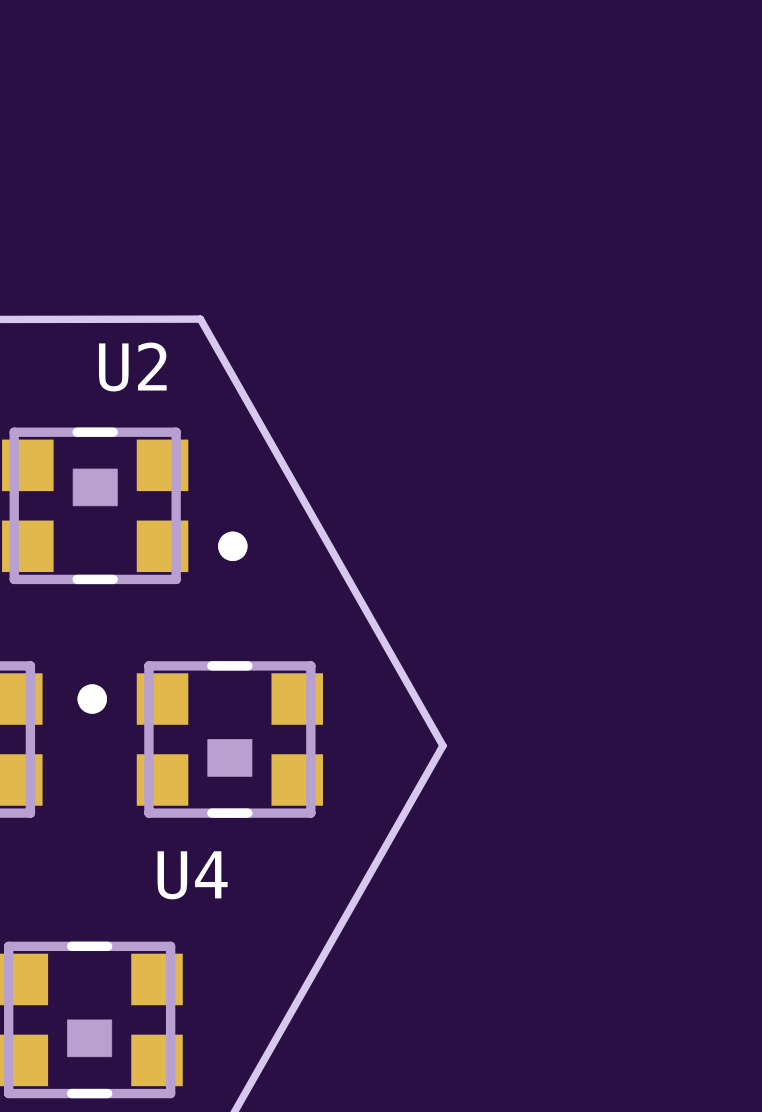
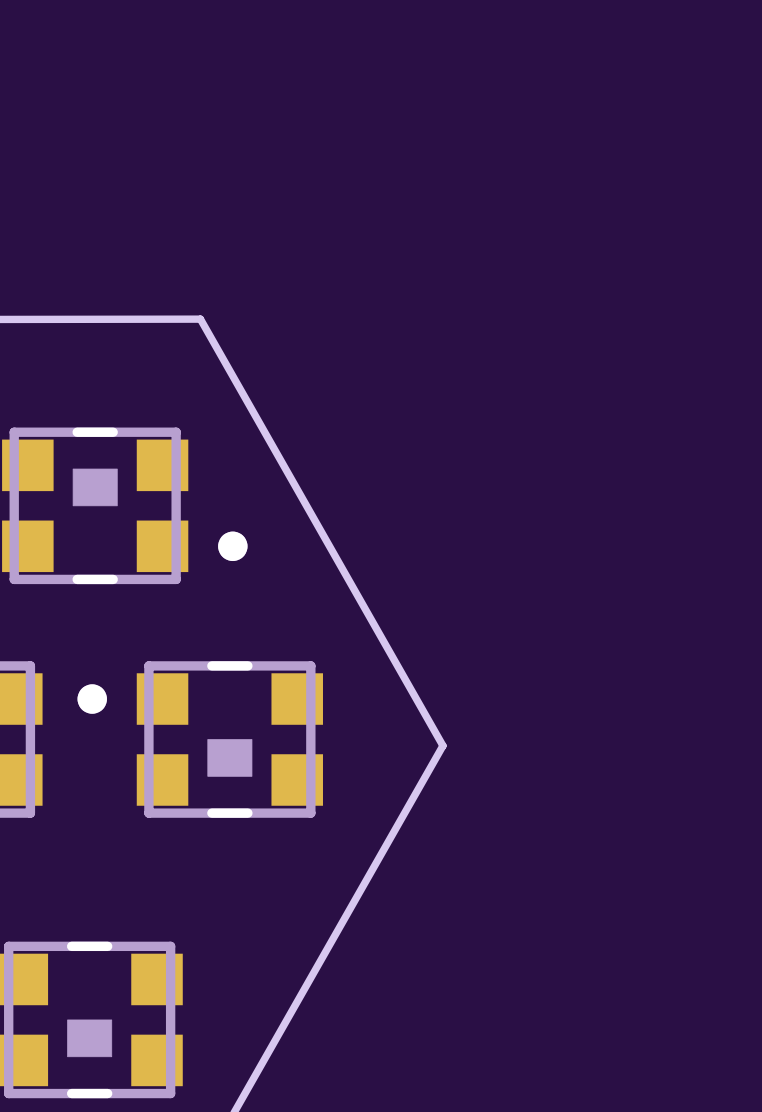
U2 name: U2 (132, 367) -> none
U4 name: U4 (192, 875) -> none

